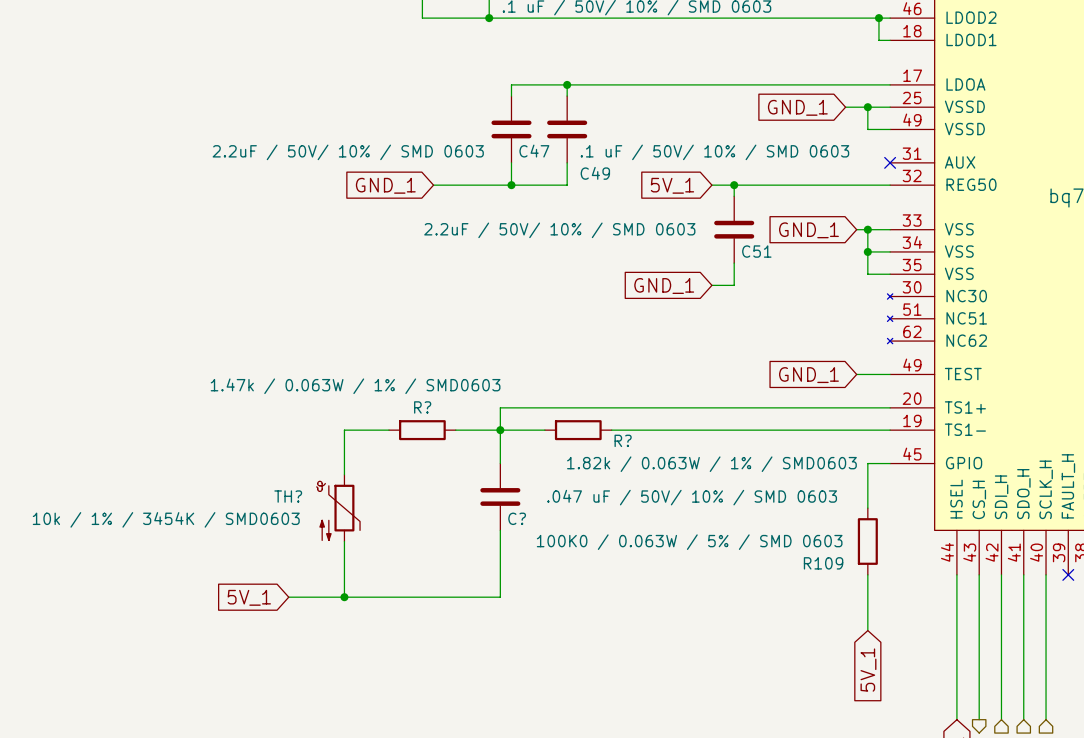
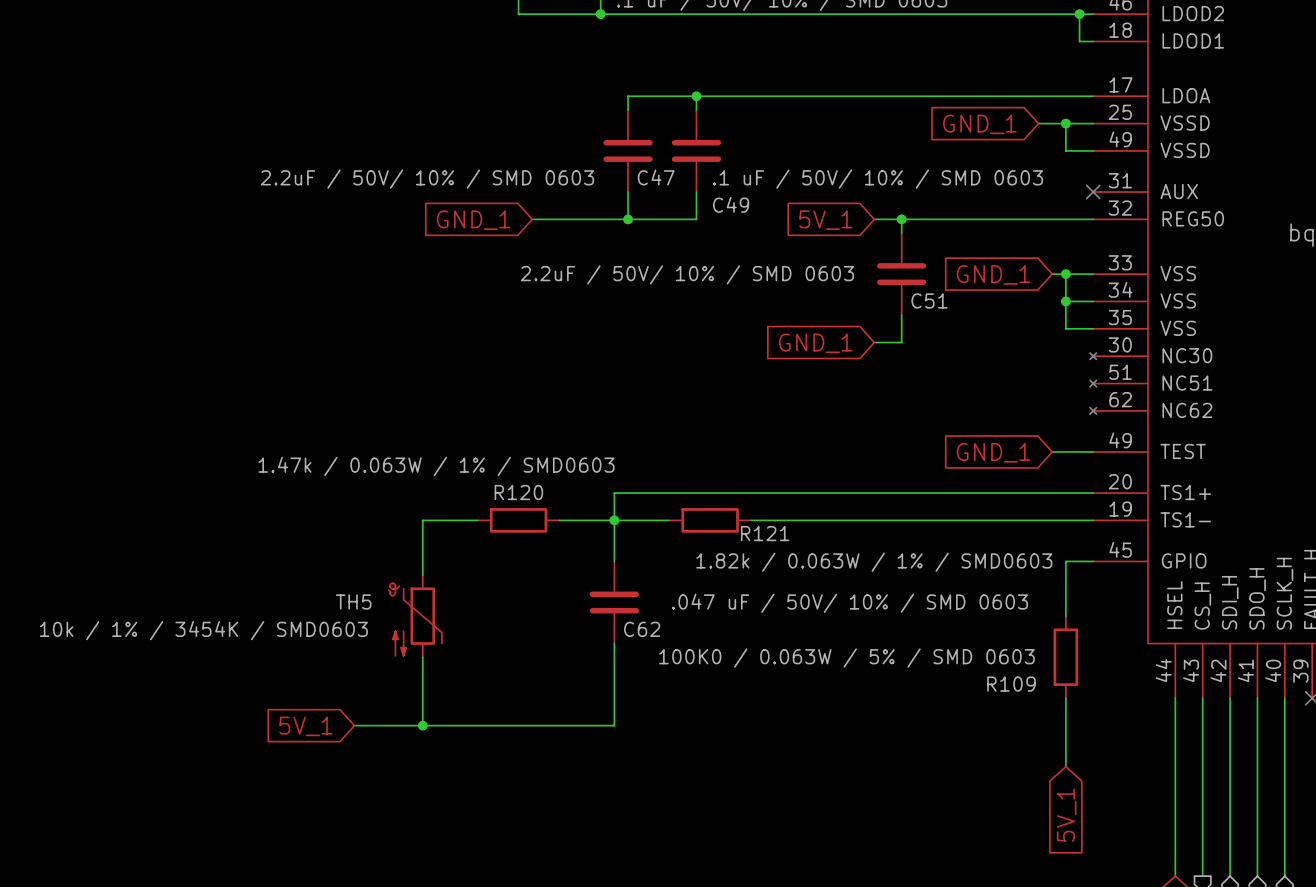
R? name: R? (422, 407) -> R120 (518, 492)
R? name: R? (623, 440) -> R121 (765, 533)
TH? name: TH? (288, 496) -> TH5 (353, 601)
C? name: C? (517, 518) -> C62 (642, 629)

